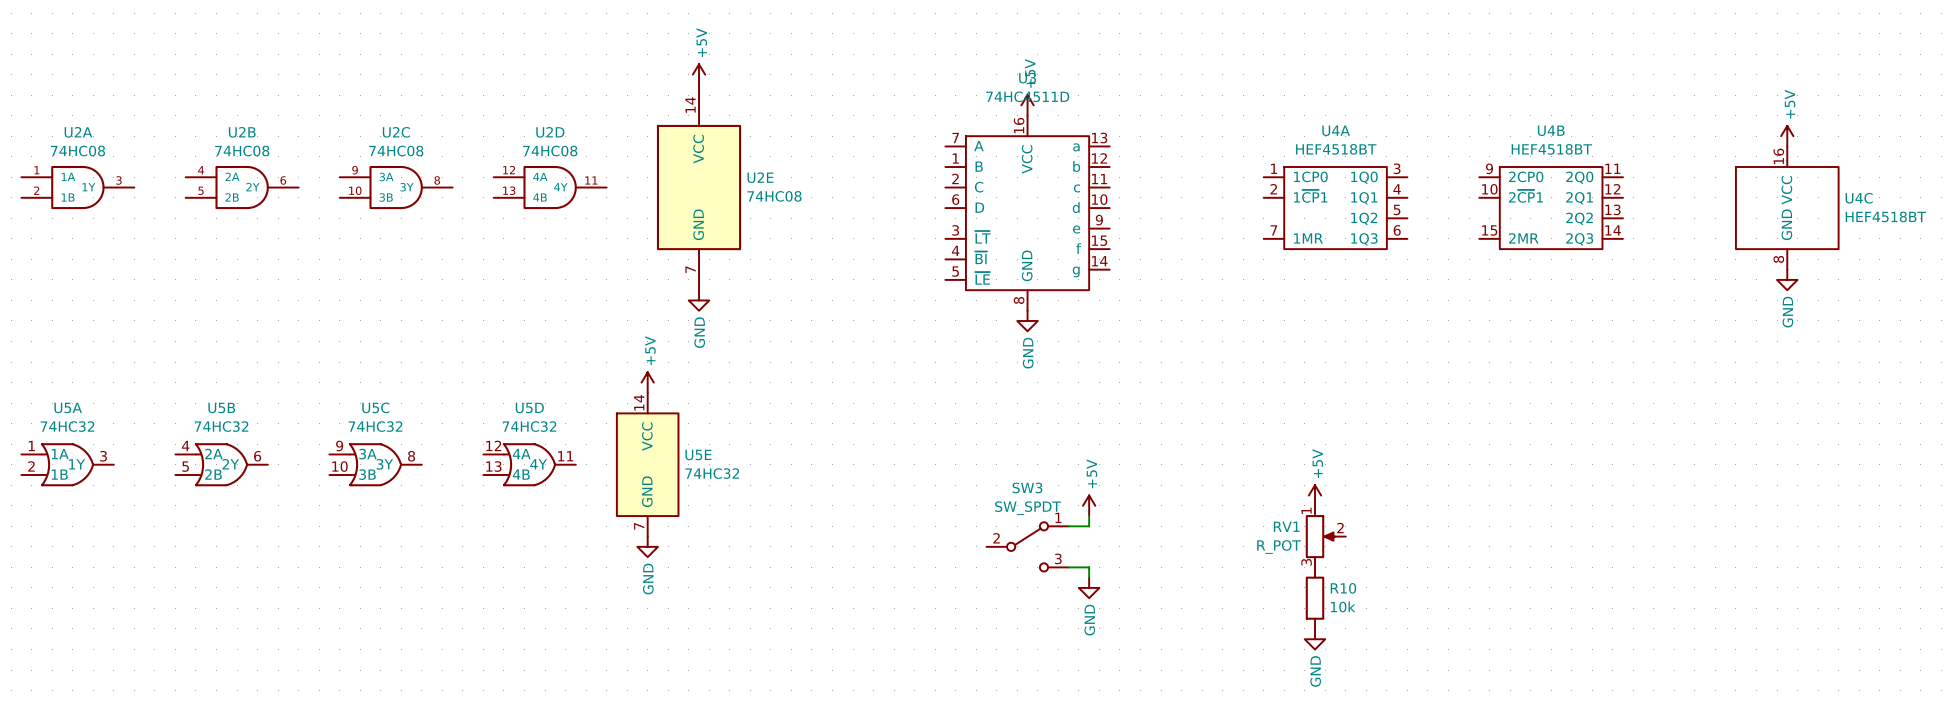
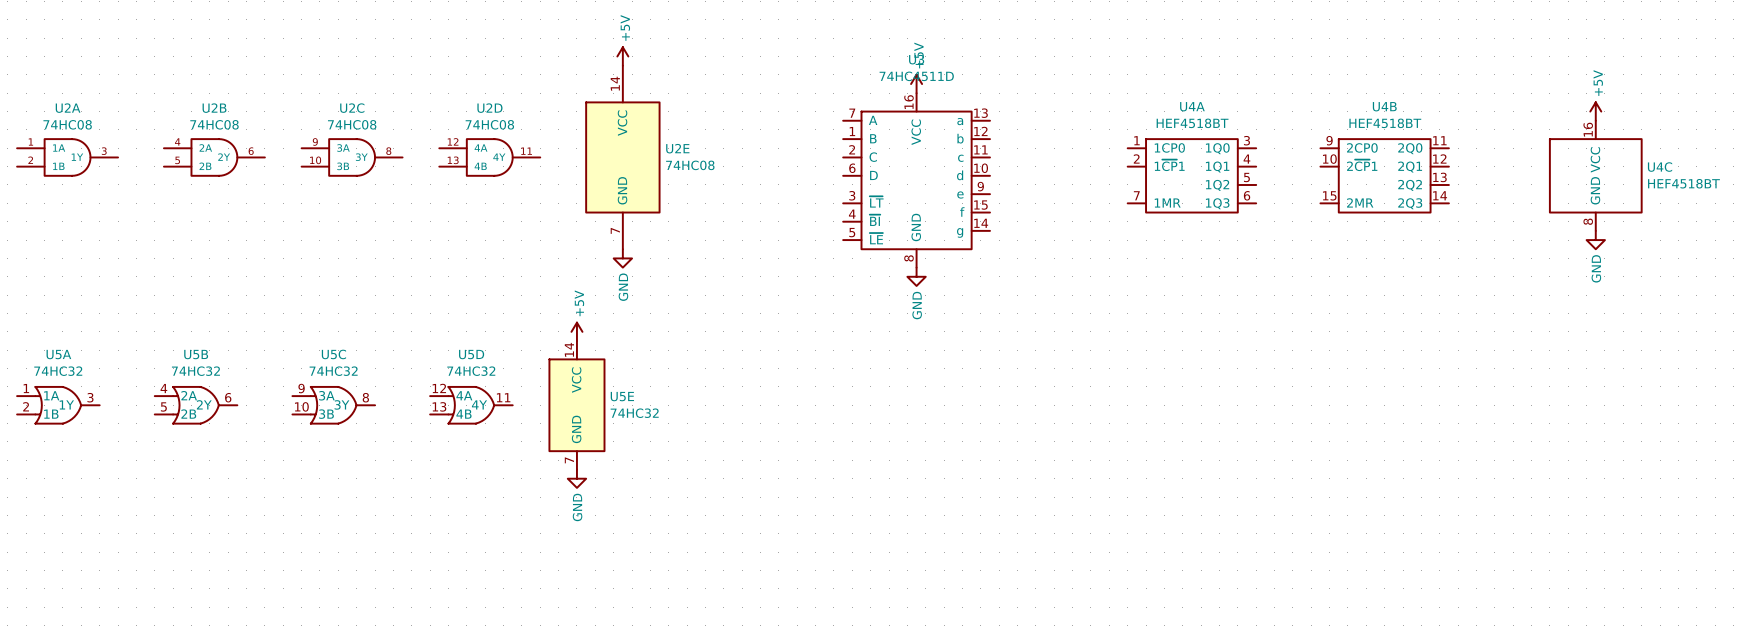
power symbol: +5V (1315, 495) -> none
power symbol: +5V (1089, 505) -> none
wire: (1089, 516) (1089, 526) (1068, 526) -> none
RV1: R_POT (1325, 536) -> none
SW3: SW_SPDT (1027, 546) -> none
wire: (1068, 567) (1089, 567) (1089, 577) -> none
power symbol: GND (1089, 587) -> none
R10: 10k (1315, 598) -> none
power symbol: GND (1315, 639) -> none

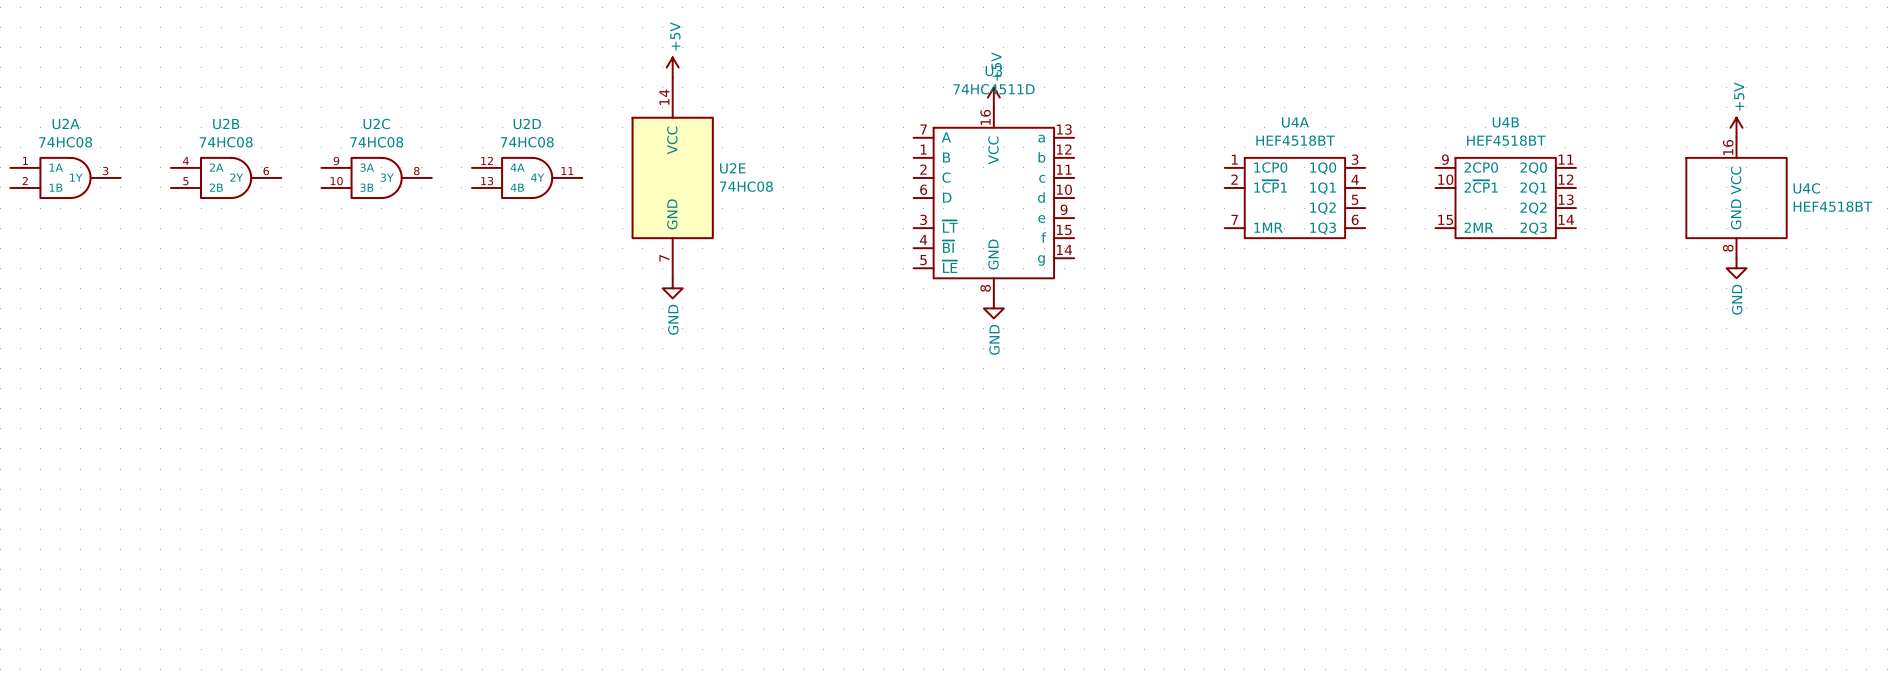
power symbol: +5V (576, 331) -> none
U5A: 74HC32 (58, 405) -> none
U5B: 74HC32 (196, 405) -> none
U5C: 74HC32 (333, 405) -> none
U5D: 74HC32 (471, 405) -> none
U5E: 74HC32 (576, 405) -> none
power symbol: GND (576, 478) -> none

